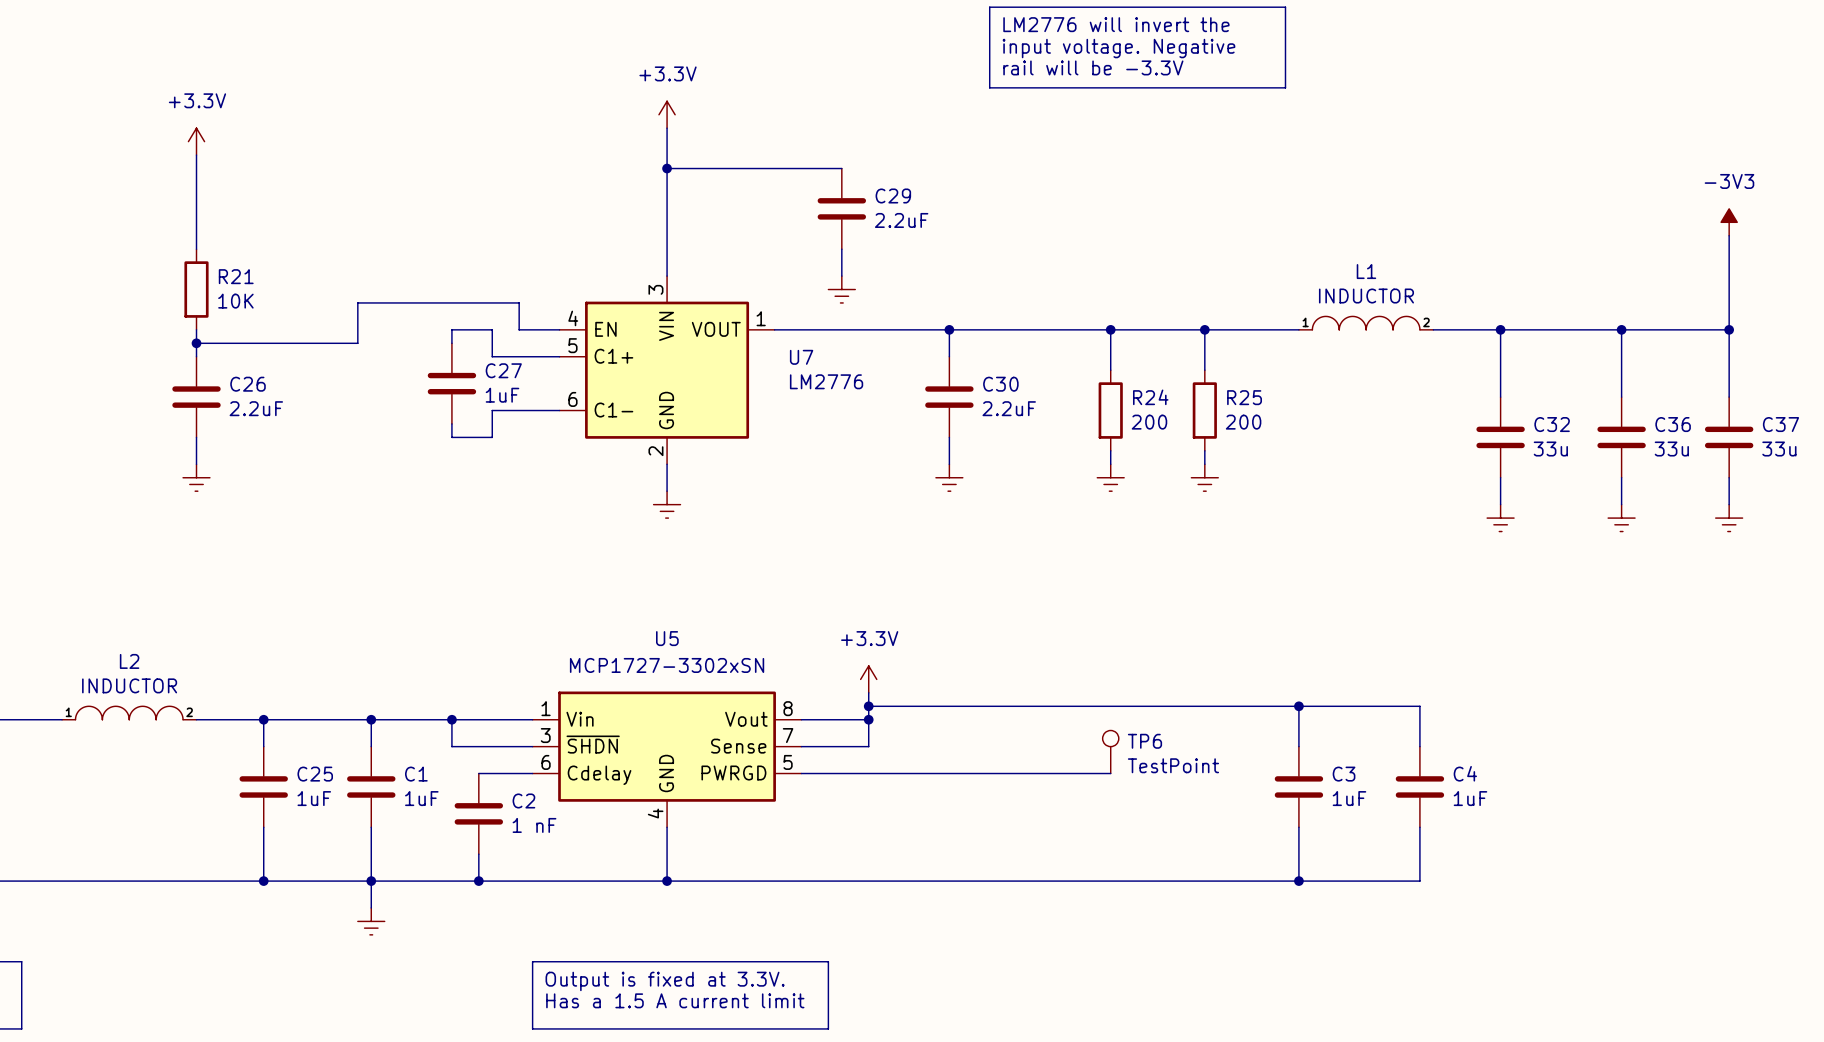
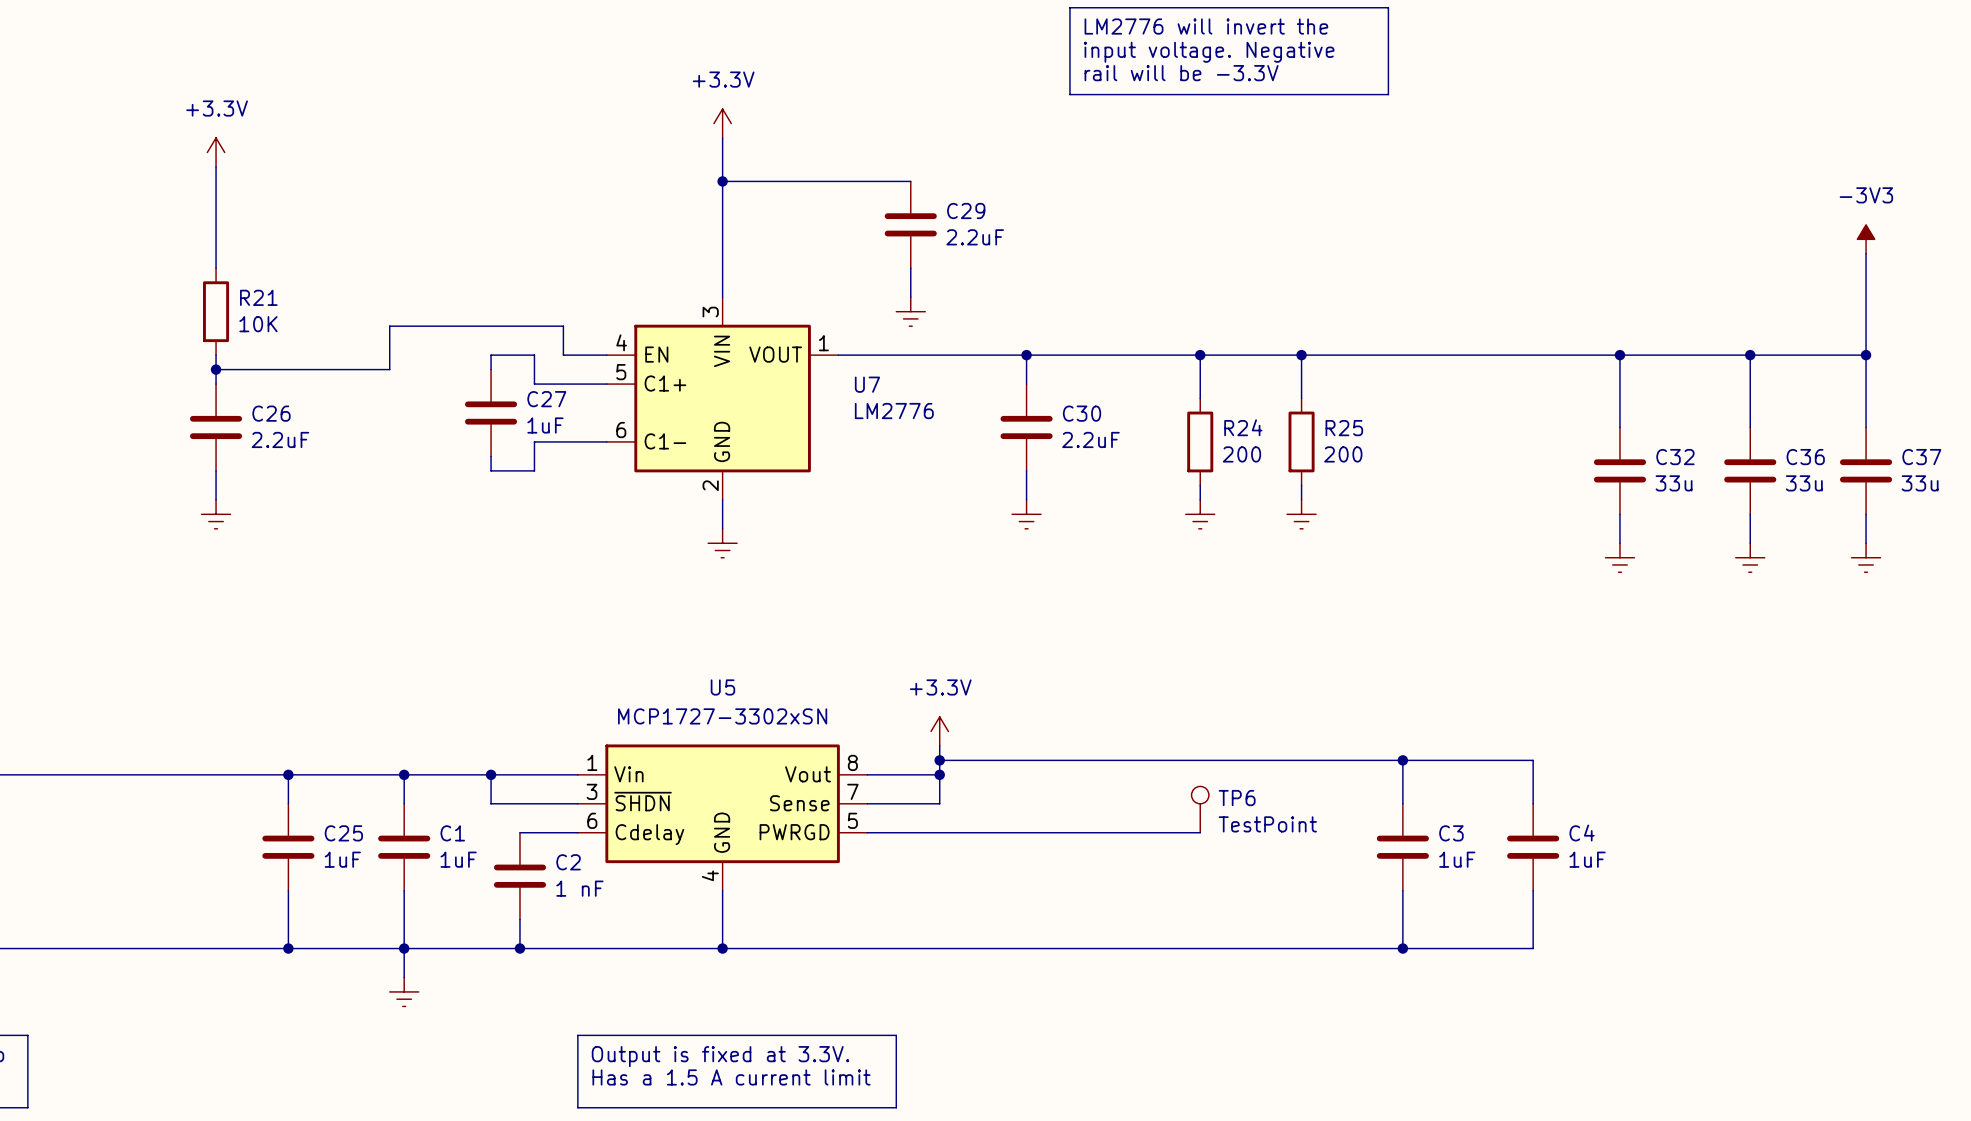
L1: INDUCTOR (1366, 323) -> none
wire: none -> (1402, 355) (1547, 355)
L2: INDUCTOR (129, 713) -> none
wire: none -> (71, 774) (216, 774)

